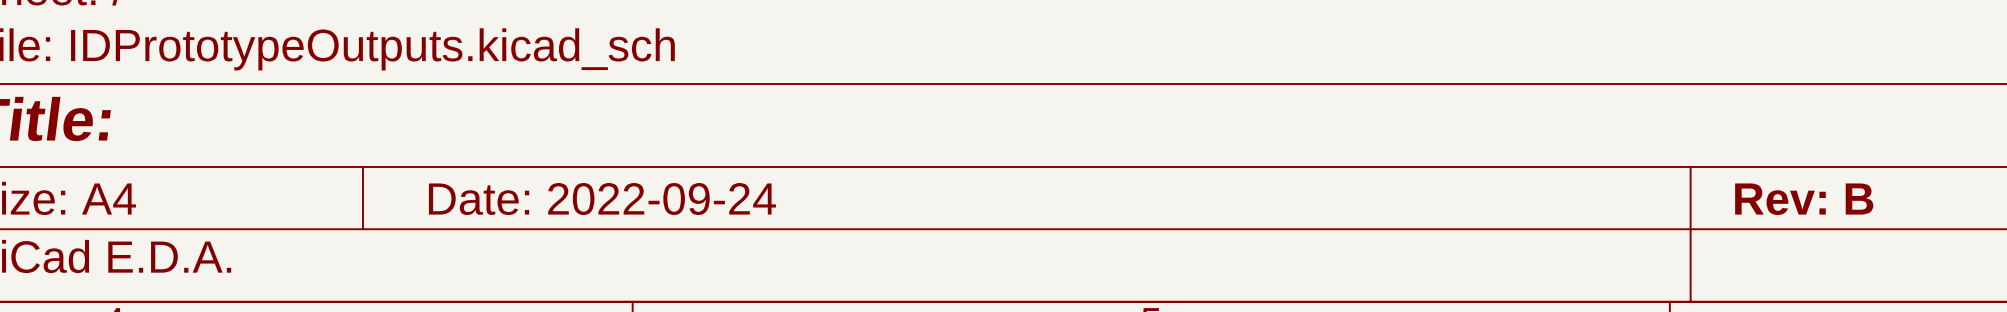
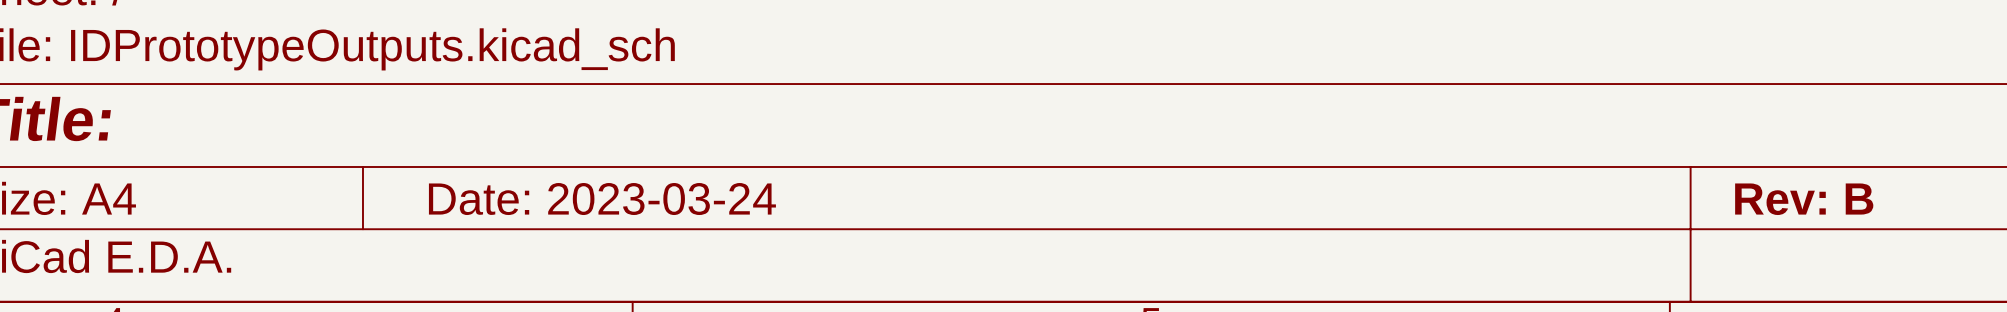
title block: Date: 2022-09-24 (602, 199) -> Date: 2023-03-24 (602, 199)

